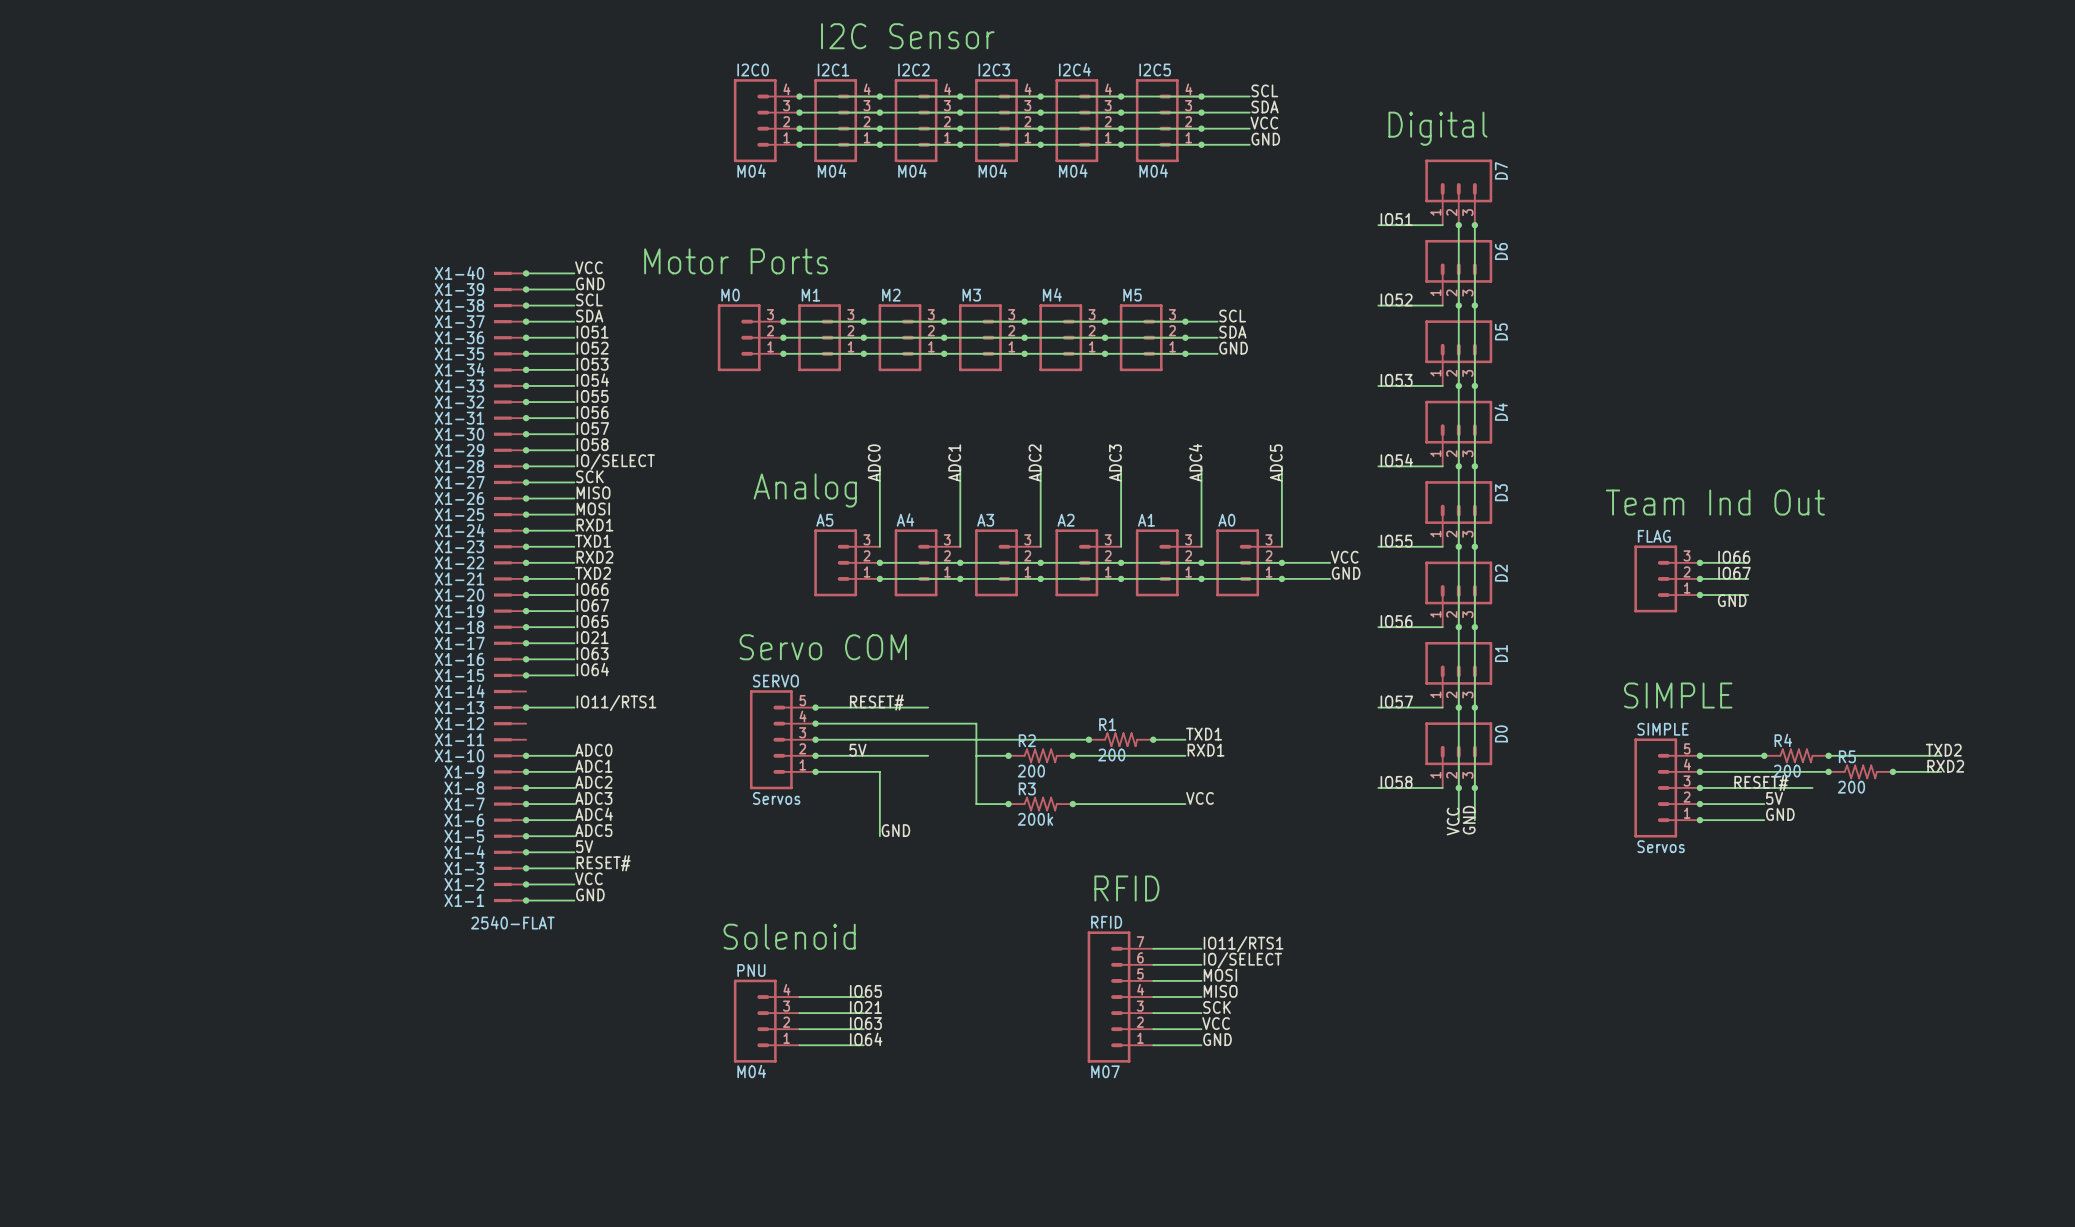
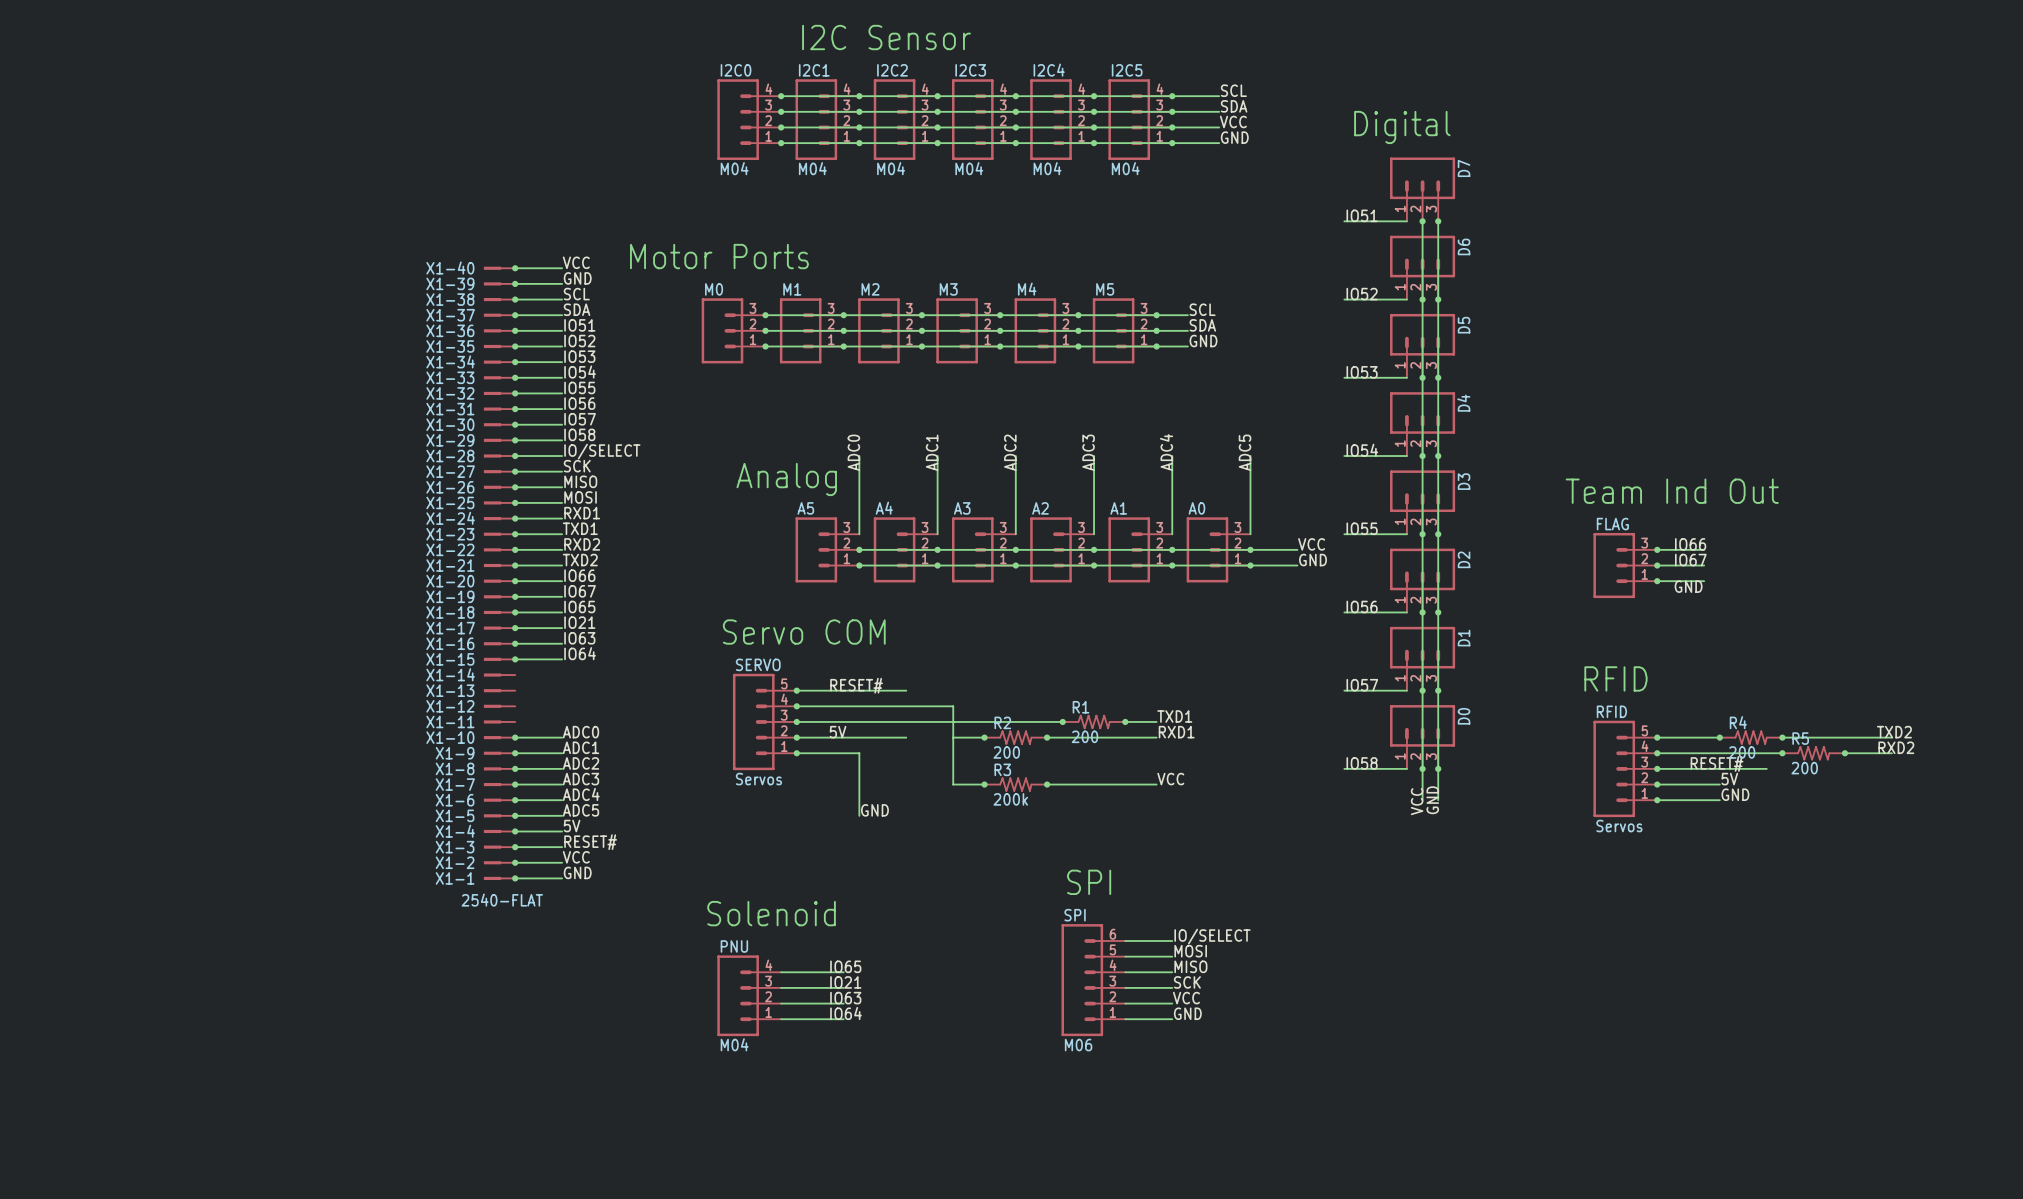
text: SIMPLE (1678, 695) -> RFID (1615, 678)
label: IO11/RTS1 (616, 703) -> none
wire: (526, 707) (574, 707) -> none
junction: (526, 707) -> none
SIMPLE name: SIMPLE (1663, 729) -> RFID (1611, 711)
text: RFID (1126, 888) -> none
text: none -> SPI (1089, 882)
label: IO11/RTS1 (1243, 944) -> none
wire: (1153, 948) (1201, 948) -> none
RFID: M07 (1120, 997) -> none
SPI: none -> M06 (1093, 980)

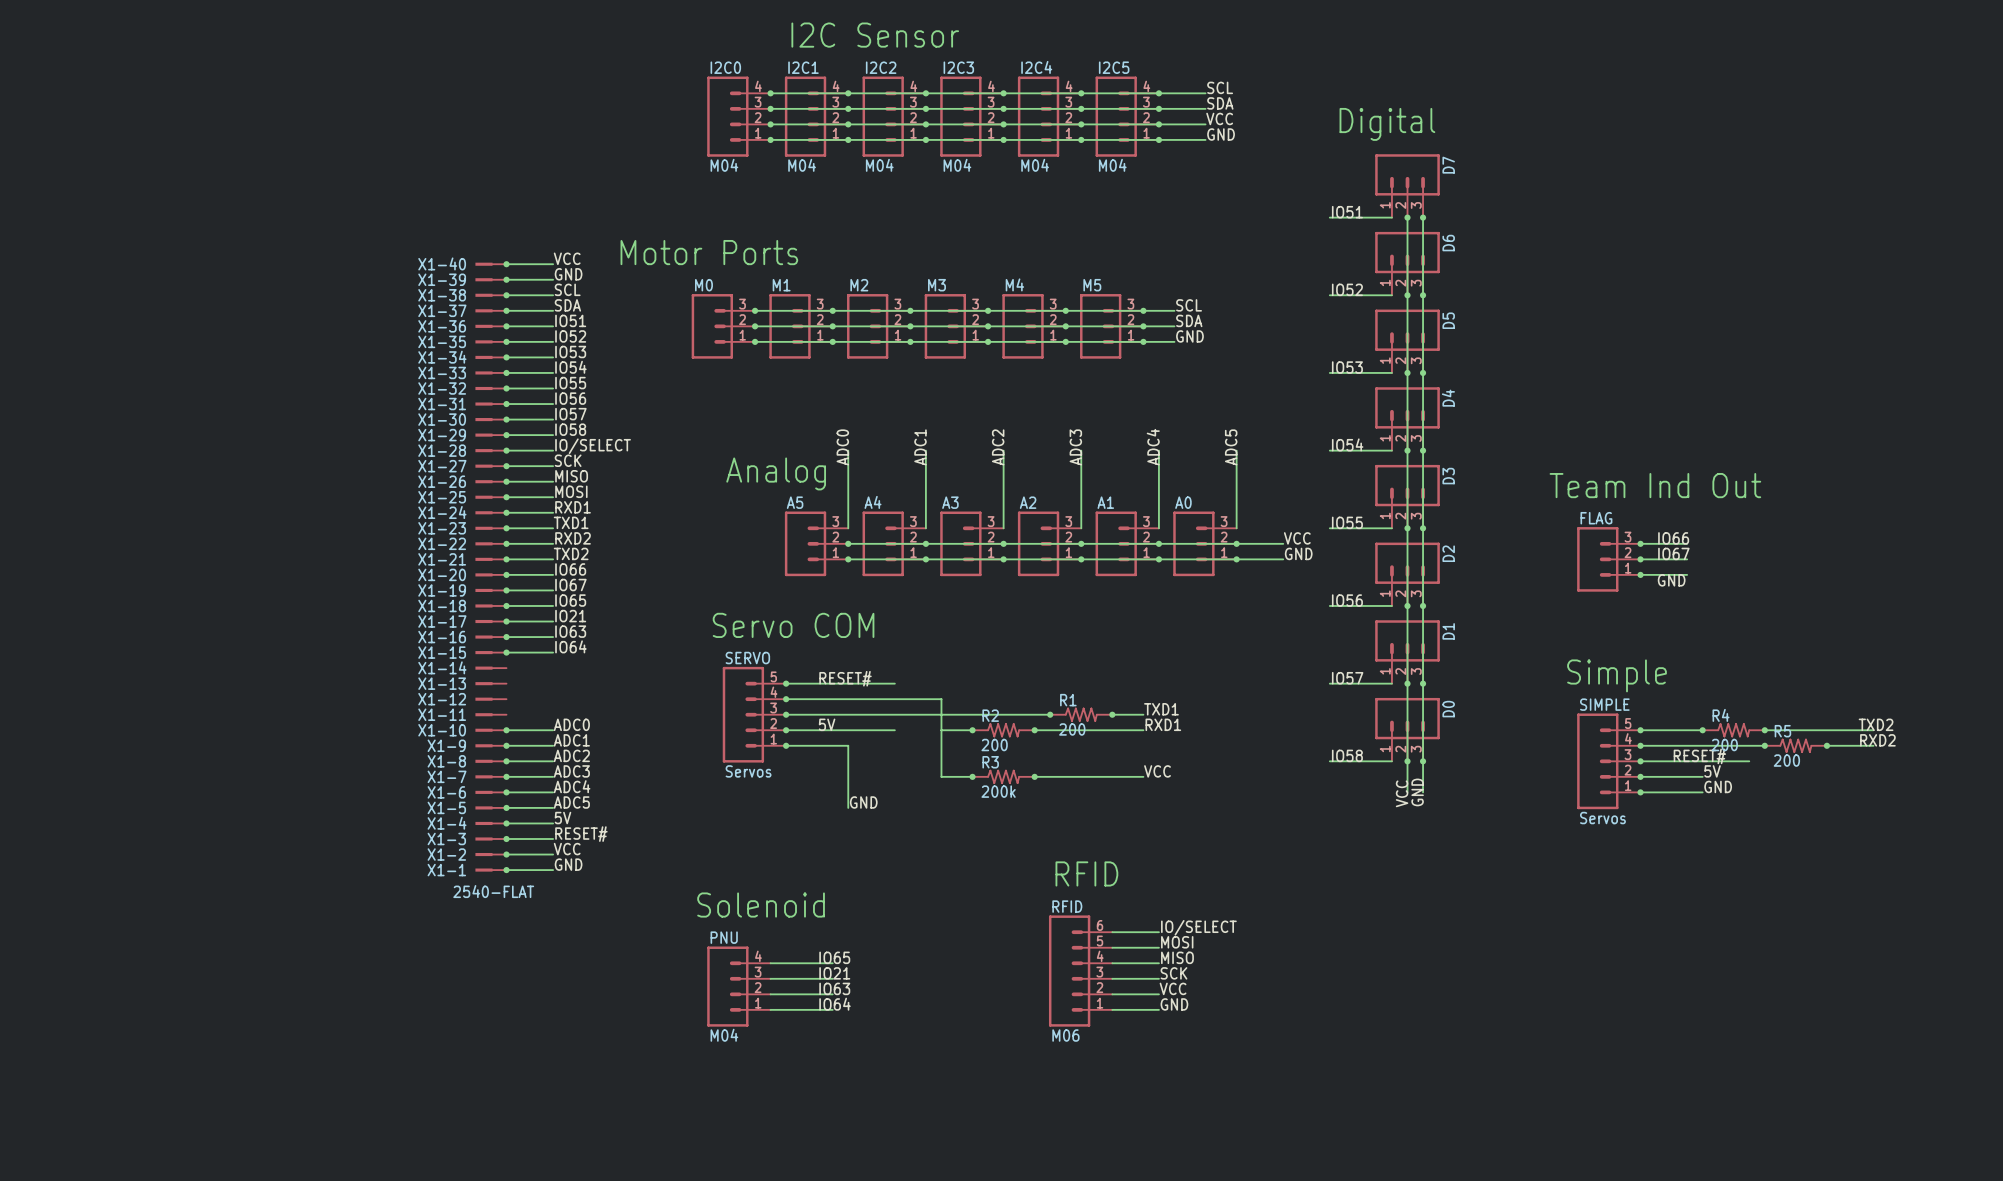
text: RFID (1615, 678) -> Simple (1617, 675)
RFID name: RFID (1611, 711) -> SIMPLE (1604, 704)
text: SPI (1089, 882) -> RFID (1086, 873)
SPI name: SPI (1075, 915) -> RFID (1067, 906)

